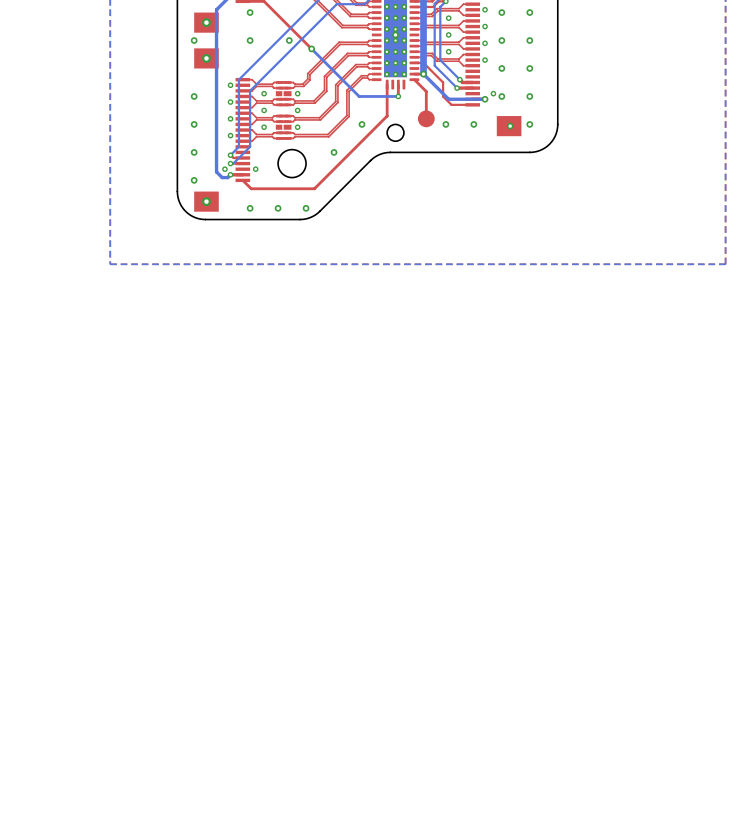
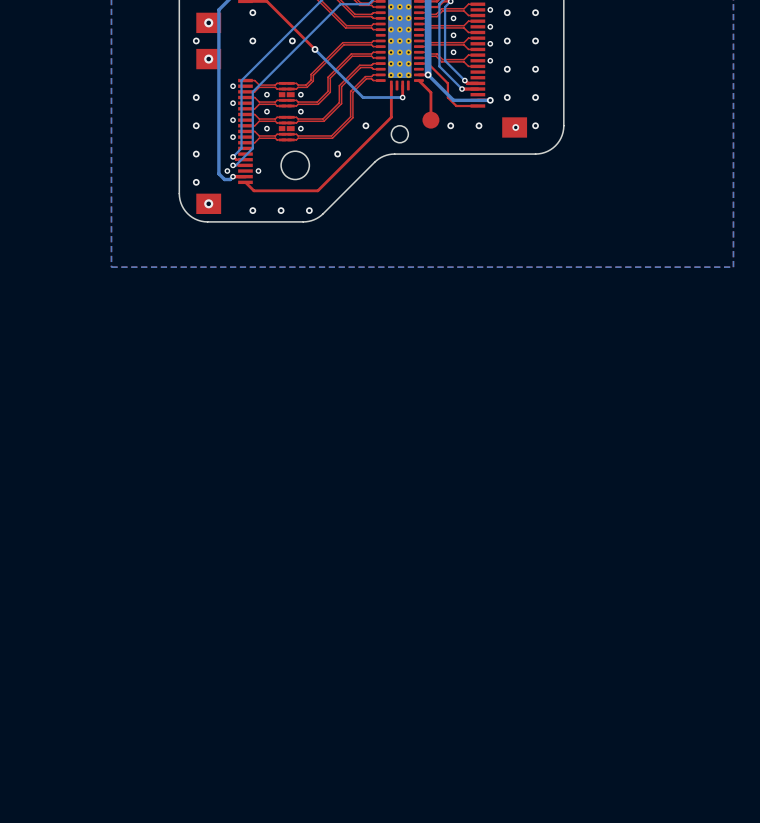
via: (395, 34) -> none
via: (493, 93) -> none

